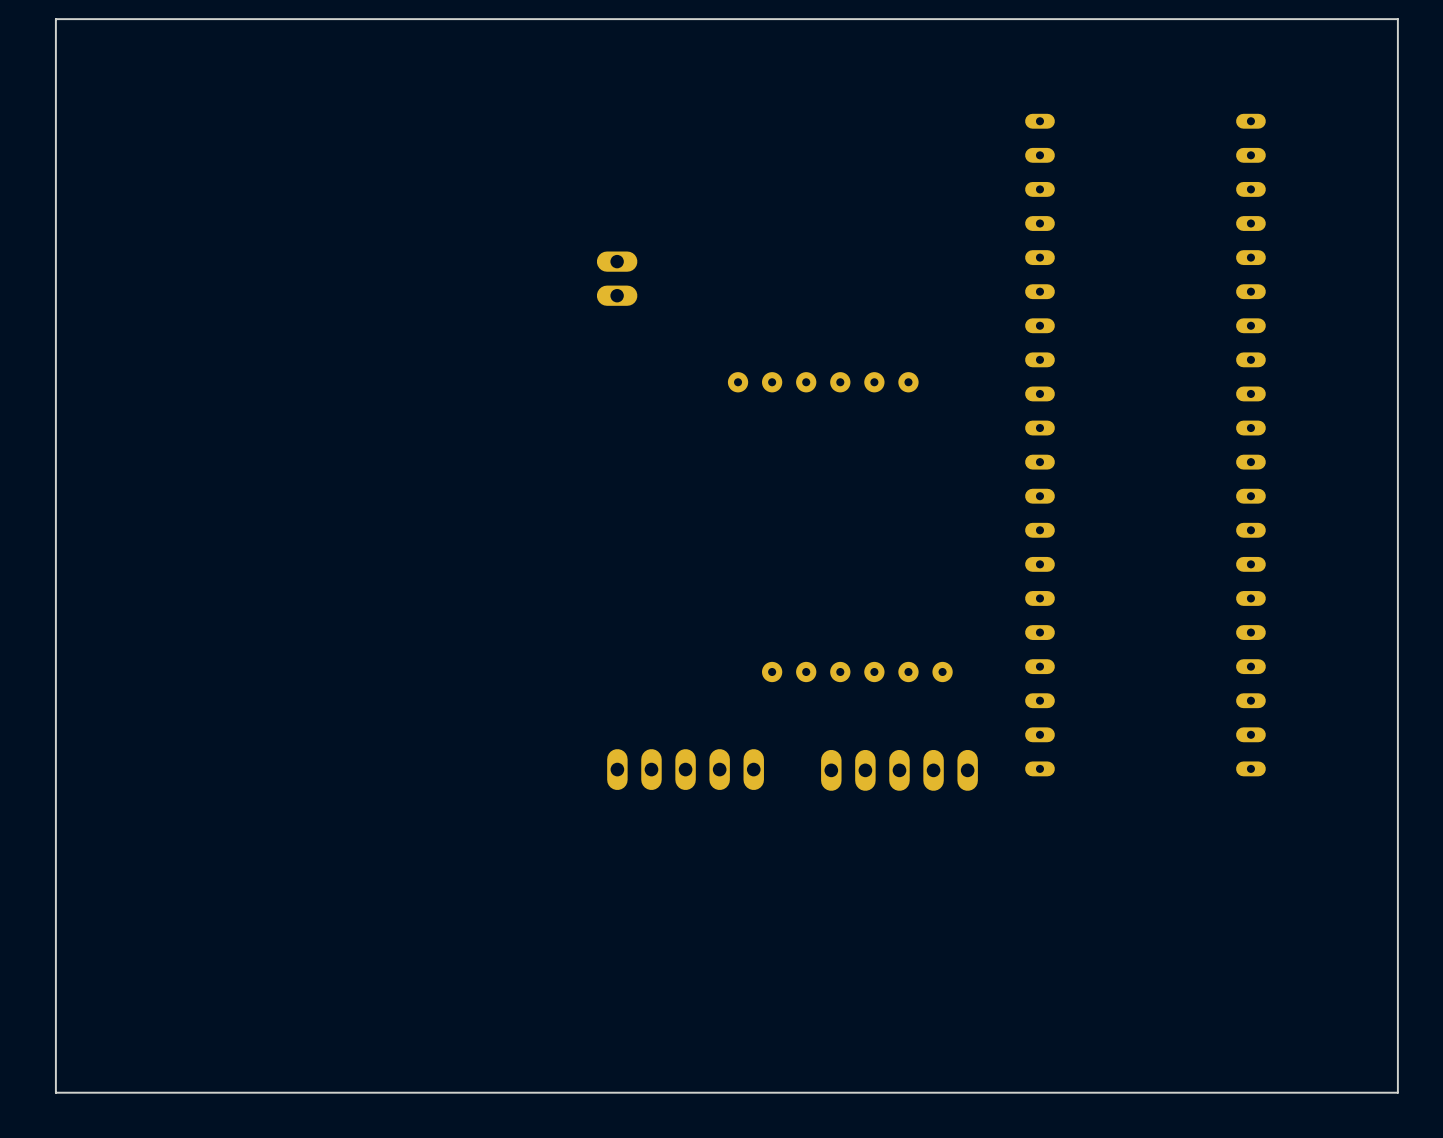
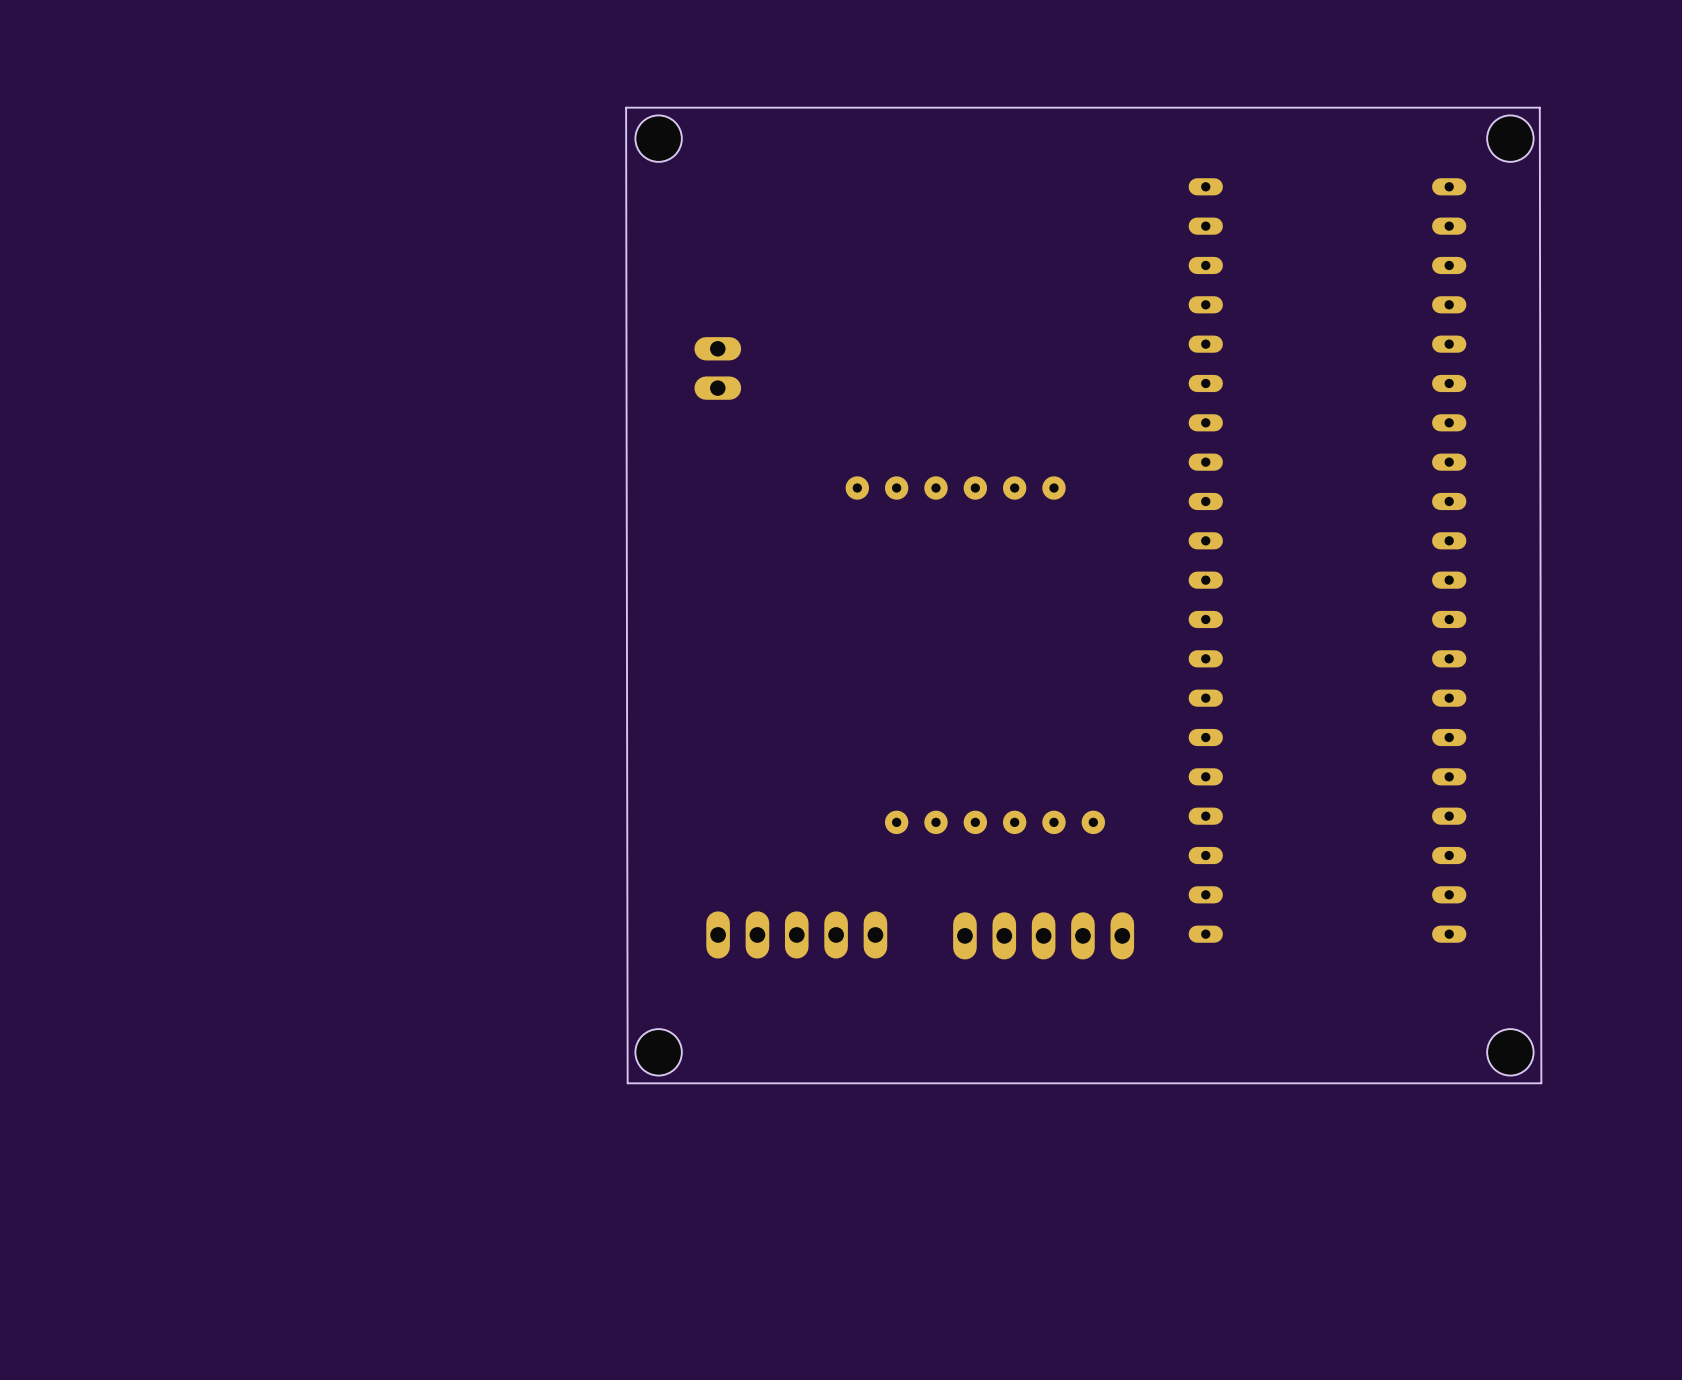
board edge: (1397, 19) (55, 19) (55, 1092) (1397, 1092) (1397, 19) -> none
board edge: none -> (1539, 107) (626, 107) (627, 1083) (1541, 1083) (1539, 107)
hole: none -> (658, 138)
hole: none -> (1510, 138)
hole: none -> (658, 1052)
hole: none -> (1510, 1052)

